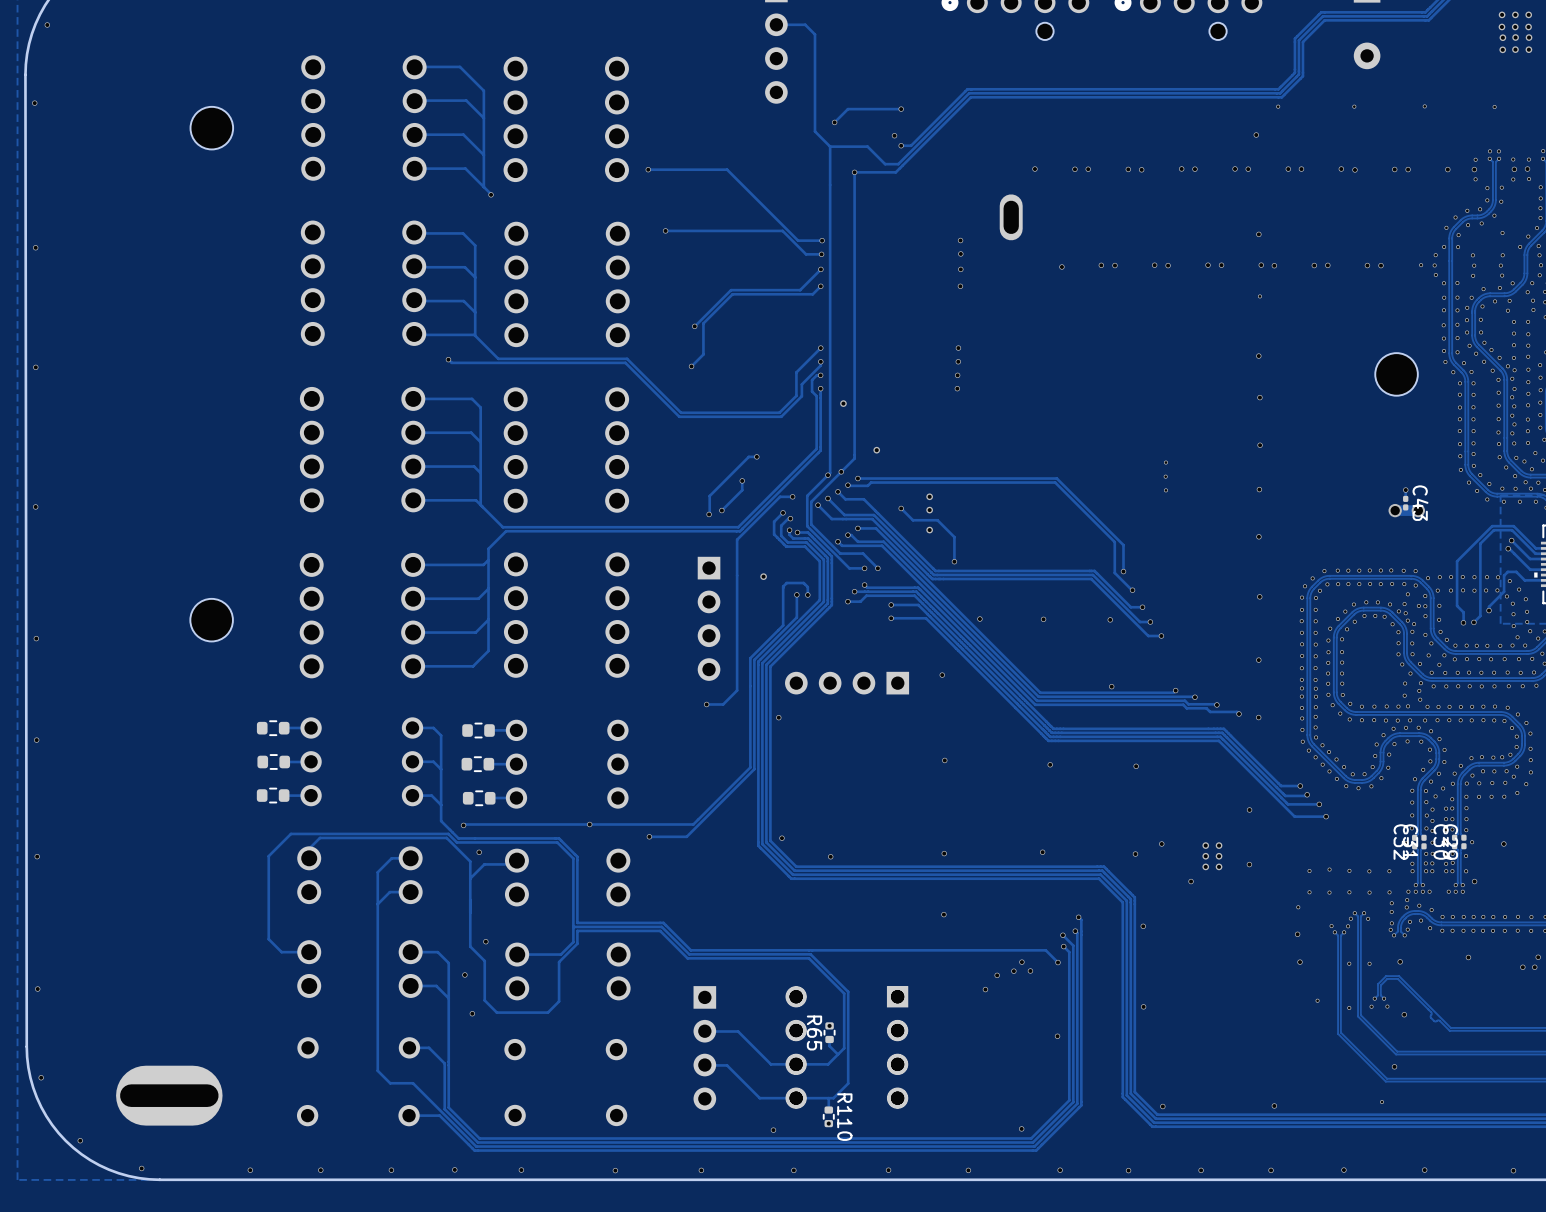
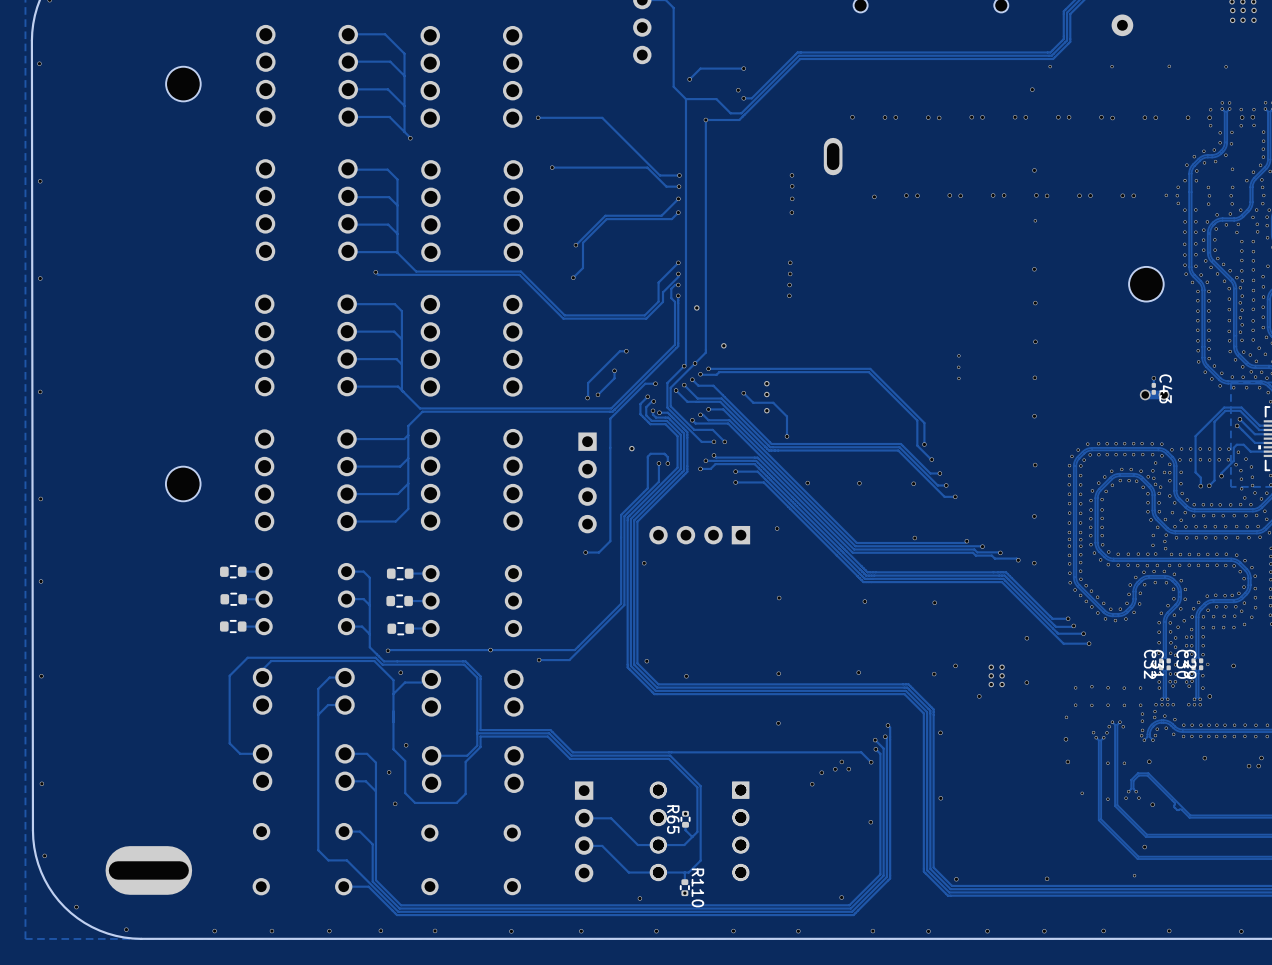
via: none -> (1173, 686)
via: none -> (1189, 686)
via: (1426, 871) -> none
via: (1432, 871) -> none
via: (1446, 871) -> none
via: (1452, 871) -> none

